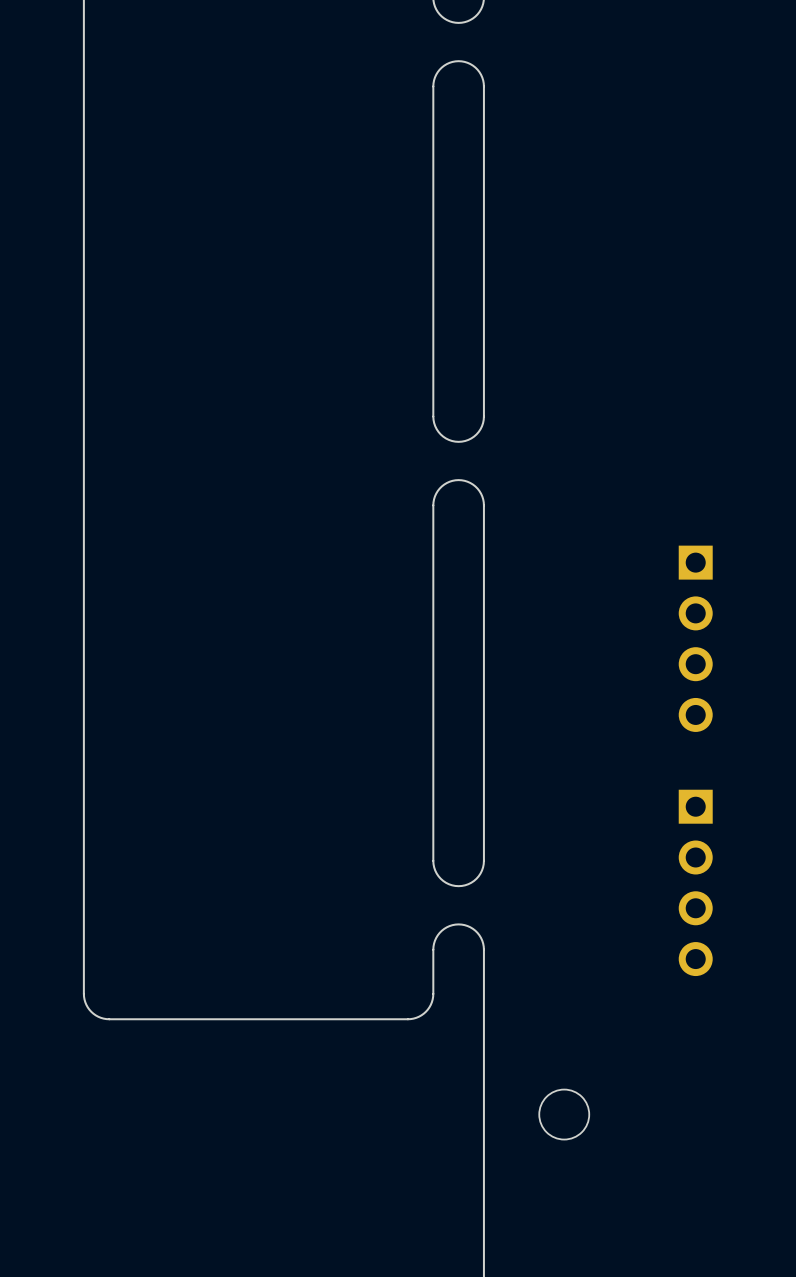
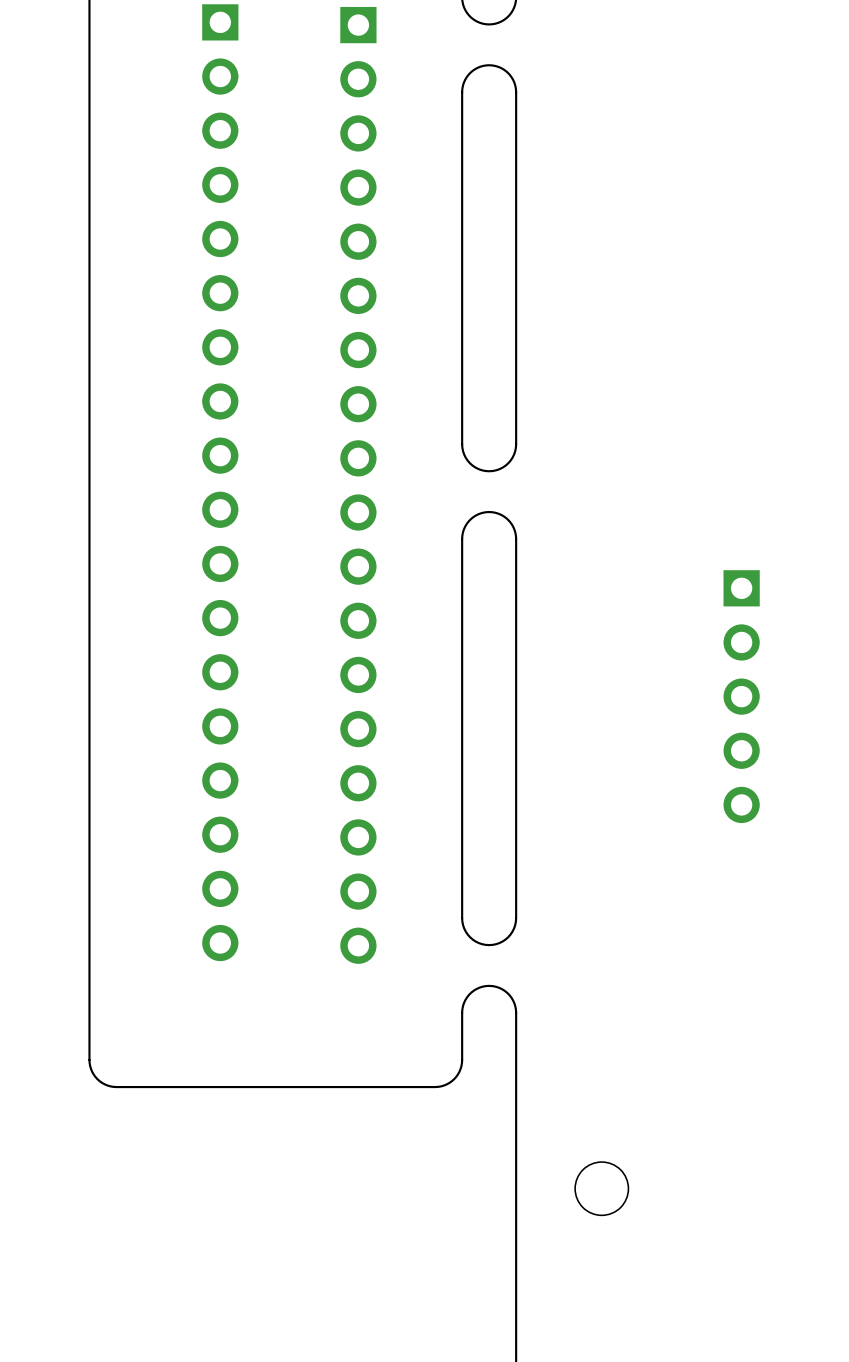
part: none -> (220, 482)
part: none -> (358, 485)
part footprint: [678, 545, 713, 732] -> [723, 570, 760, 824]
part: (695, 882) -> none

